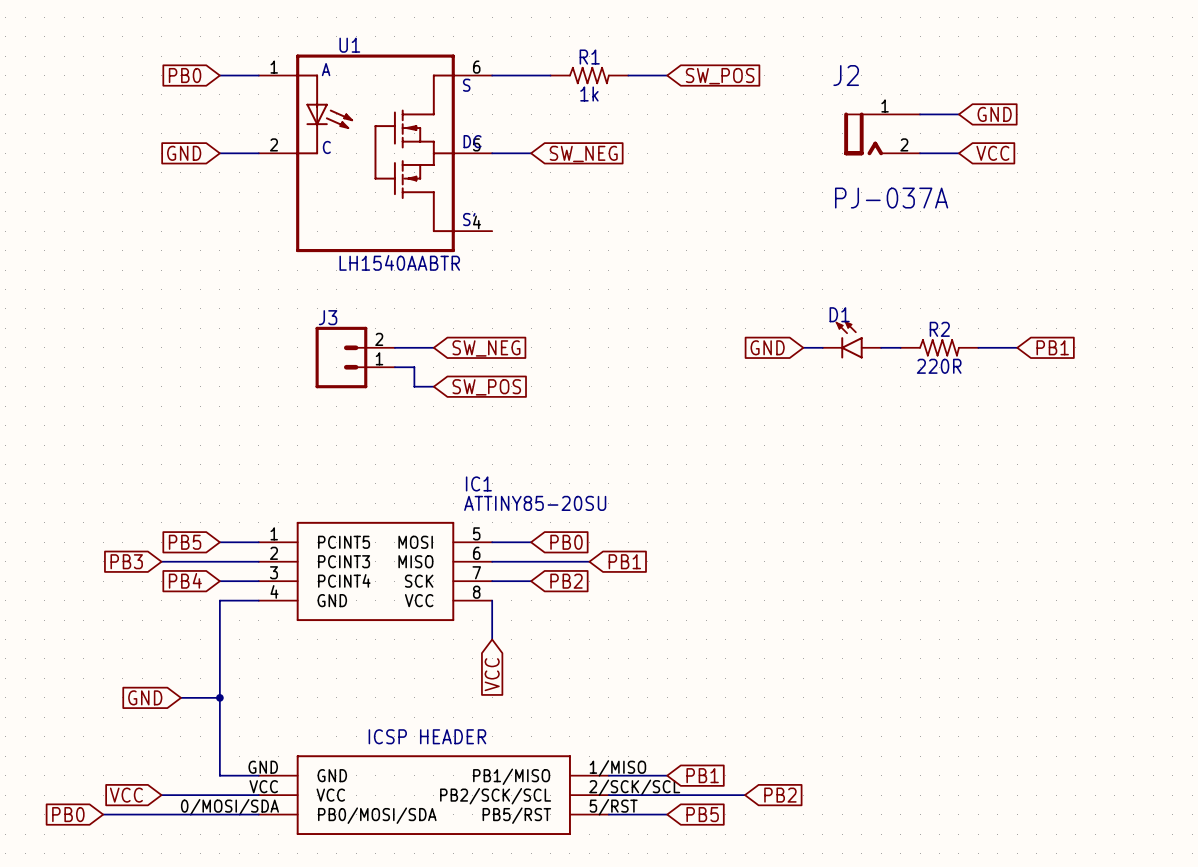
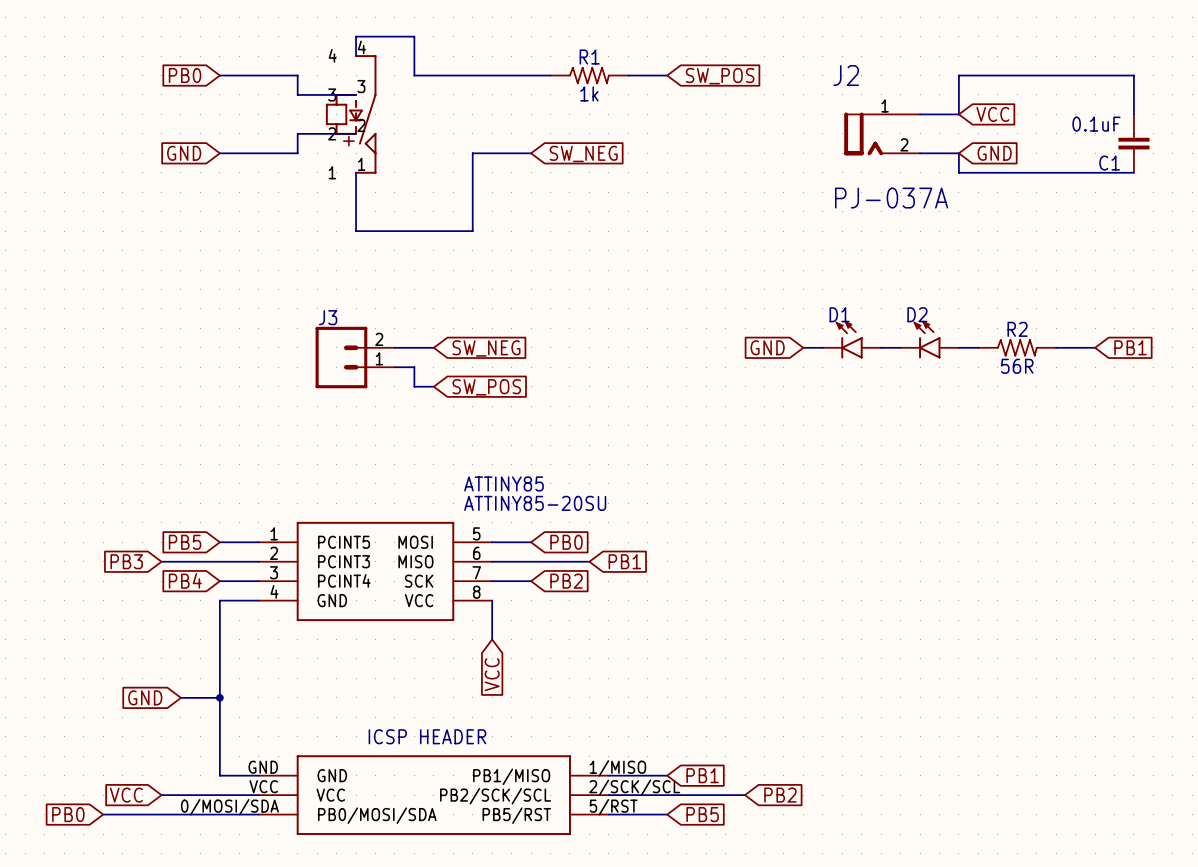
wire: none -> (356, 56) (356, 36) (414, 36) (414, 75) (492, 75)
wire: none -> (258, 75) (297, 75) (297, 94) (356, 94)
part: none -> (351, 114)
wire: none -> (958, 114) (958, 75) (1133, 75) (1133, 114)
global label: GND (994, 114) -> VCC (992, 114)
wire: none -> (356, 133) (297, 133) (297, 153) (258, 153)
C1: none -> 0.1uF (1133, 143)
U1: LH1540AABTR (375, 153) -> none
wire: none -> (492, 153) (472, 153) (472, 231) (356, 231) (356, 172)
wire: none -> (958, 153) (958, 172) (1133, 172)
global label: VCC (992, 153) -> GND (994, 153)
D2: none -> (929, 339)
R2 position: (939, 347) -> (1017, 347)
global label position: PB1 (1052, 347) -> PB1 (1130, 347)
wire: none -> (1056, 347) (1095, 347)
R2 value: 220R (939, 366) -> 56R (1017, 366)
IC1 name: IC1 (478, 483) -> ATTINY85 (503, 483)

